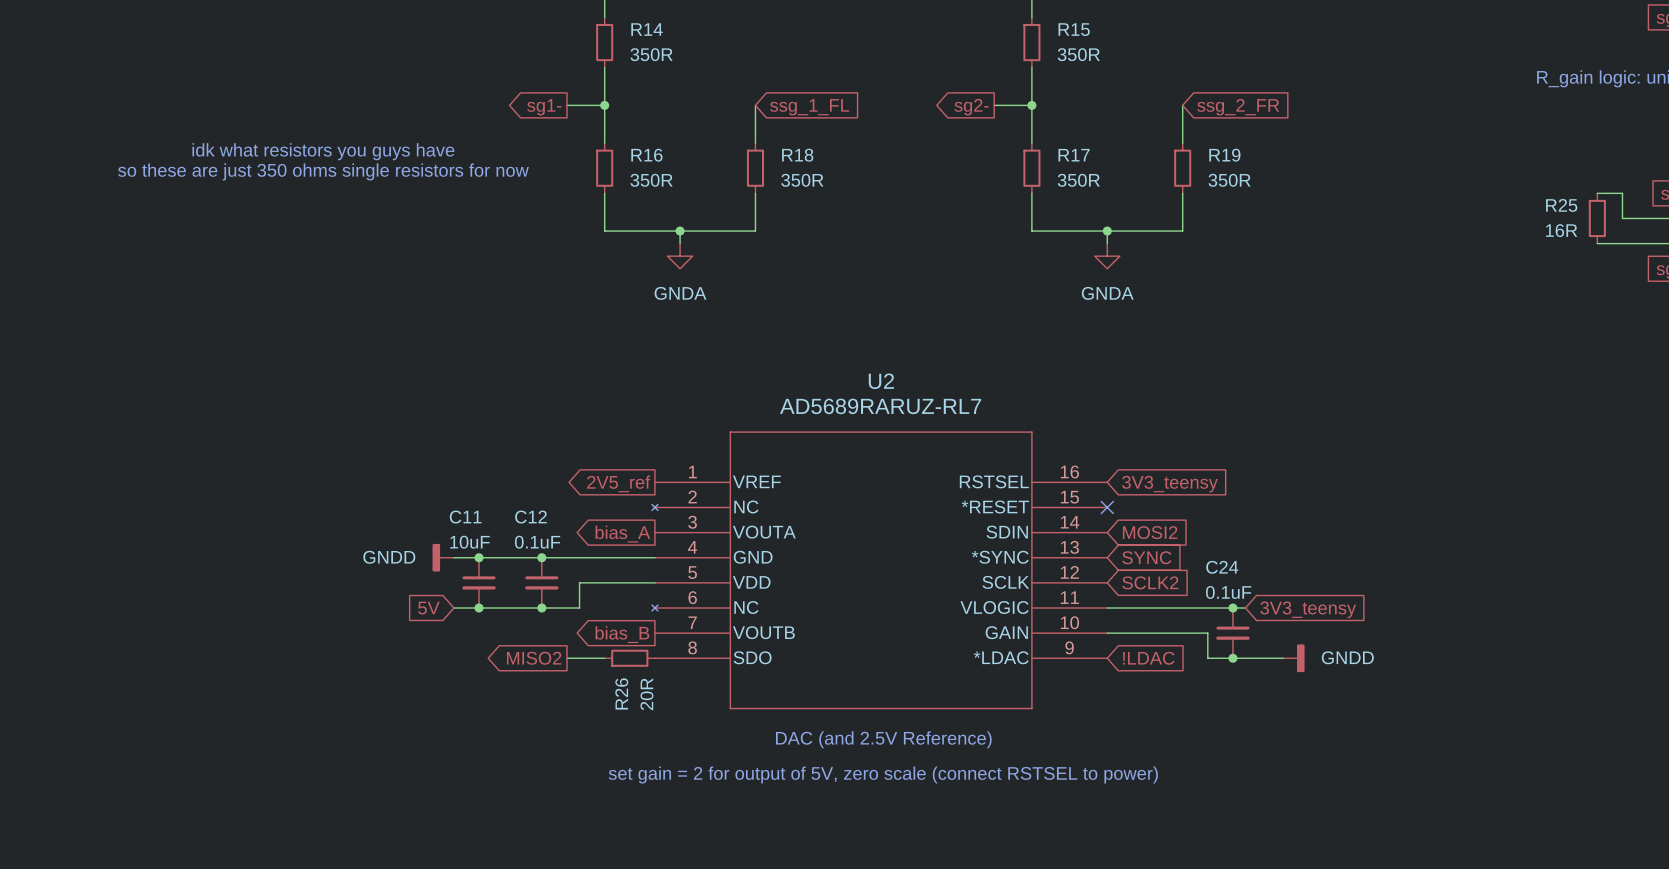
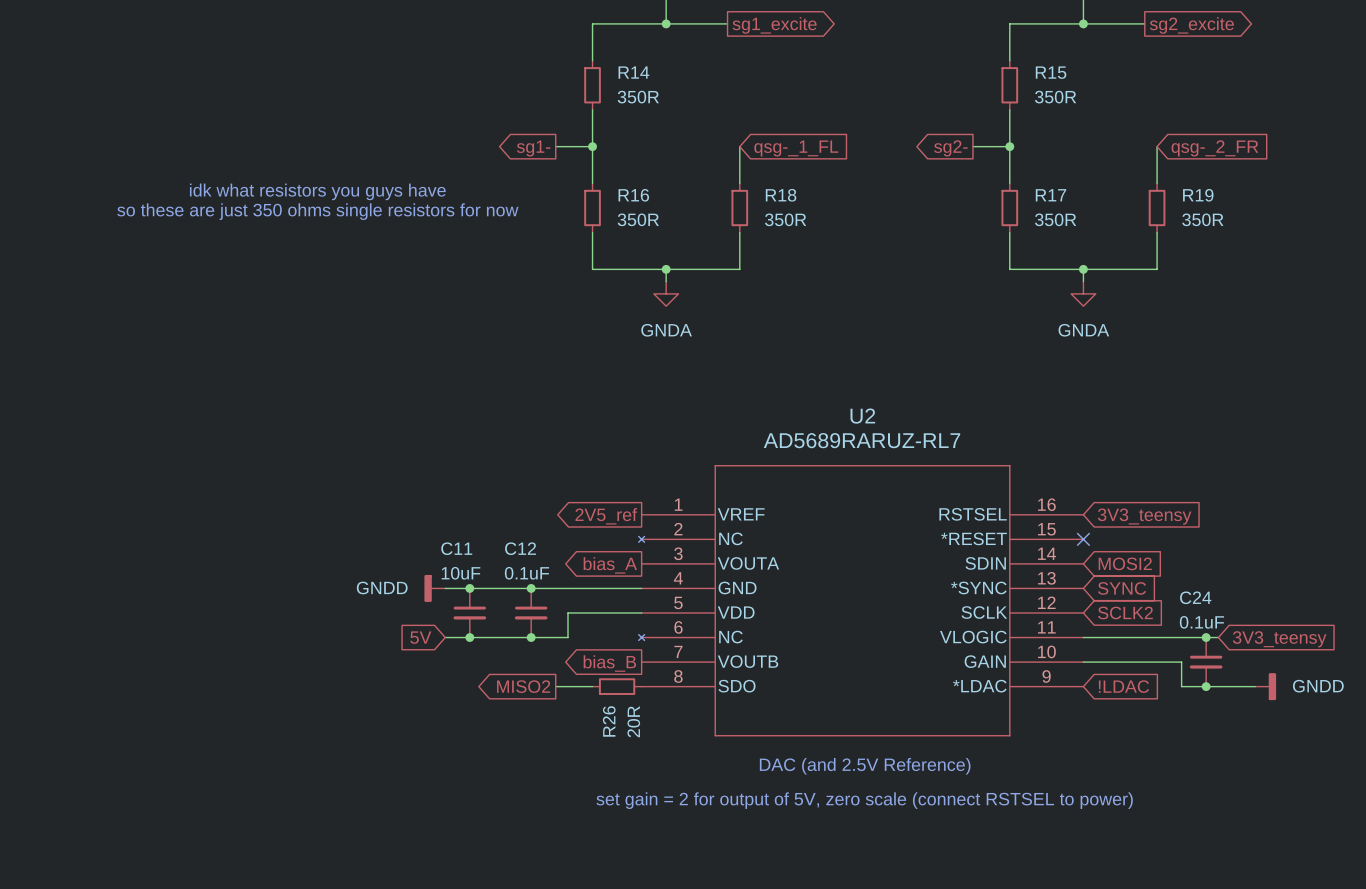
global label: ssg_1_FL (809, 107) -> qsg-_1_FL (796, 148)
global label: ssg_2_FR (1238, 107) -> qsg-_2_FR (1214, 148)

